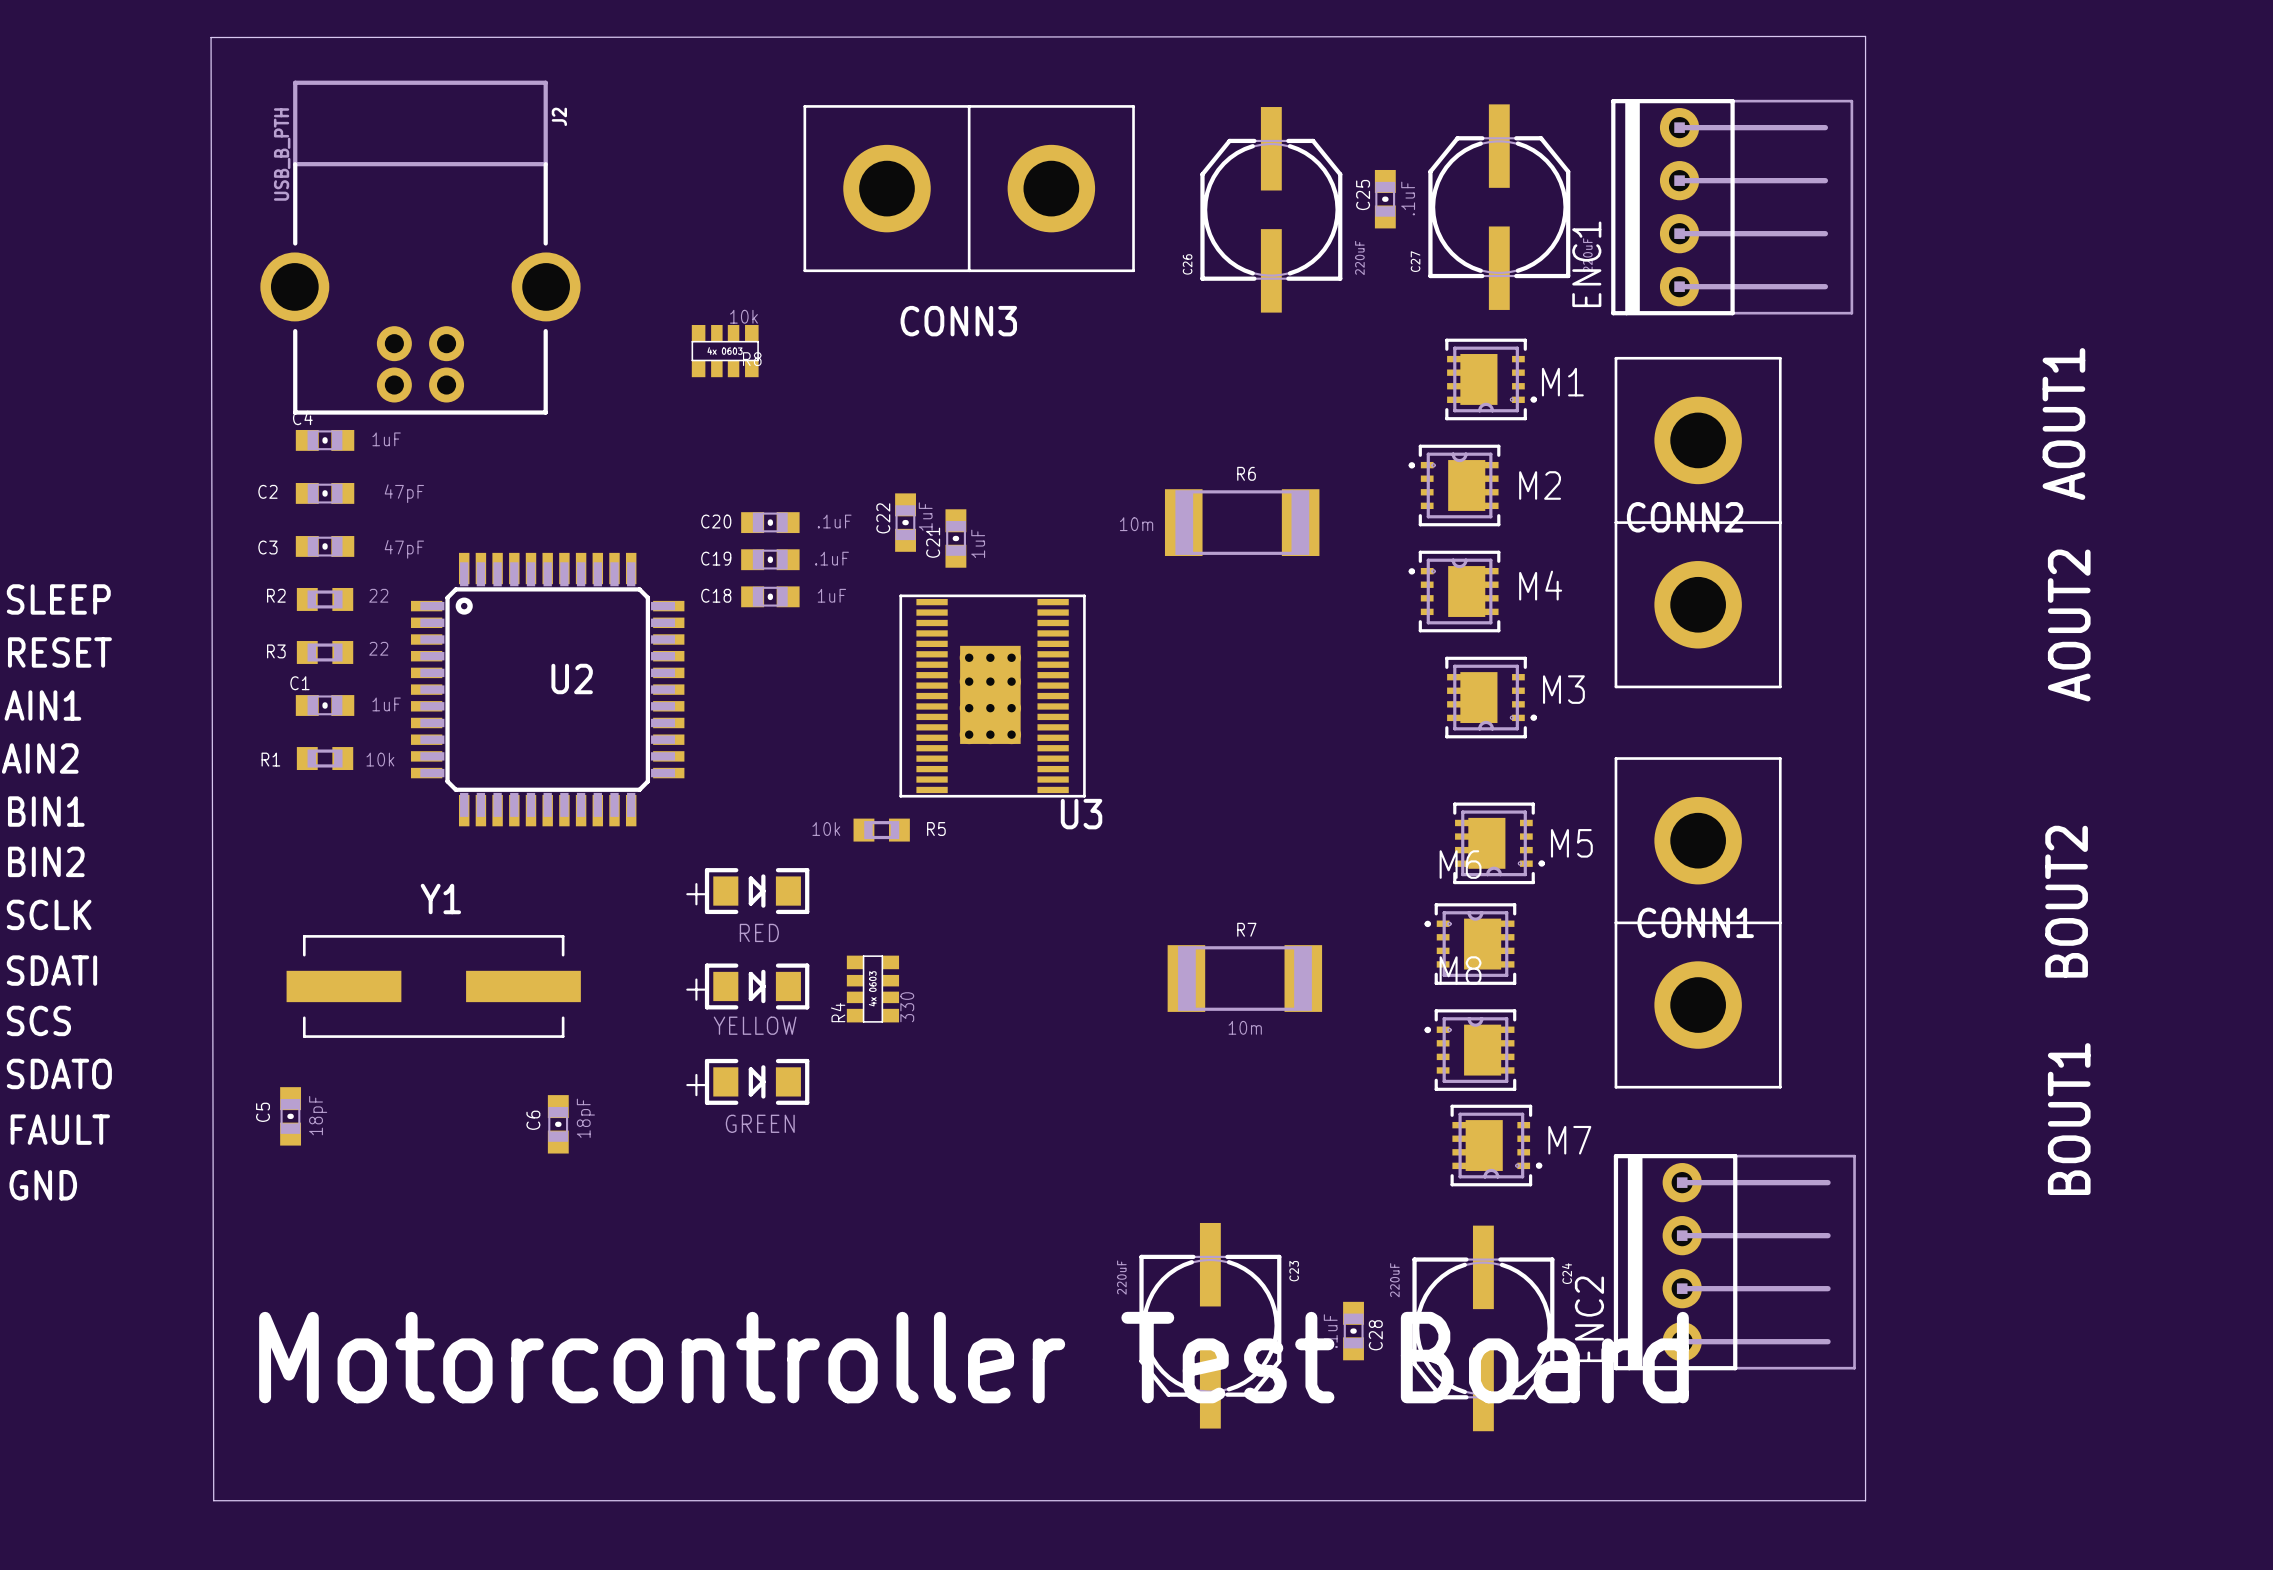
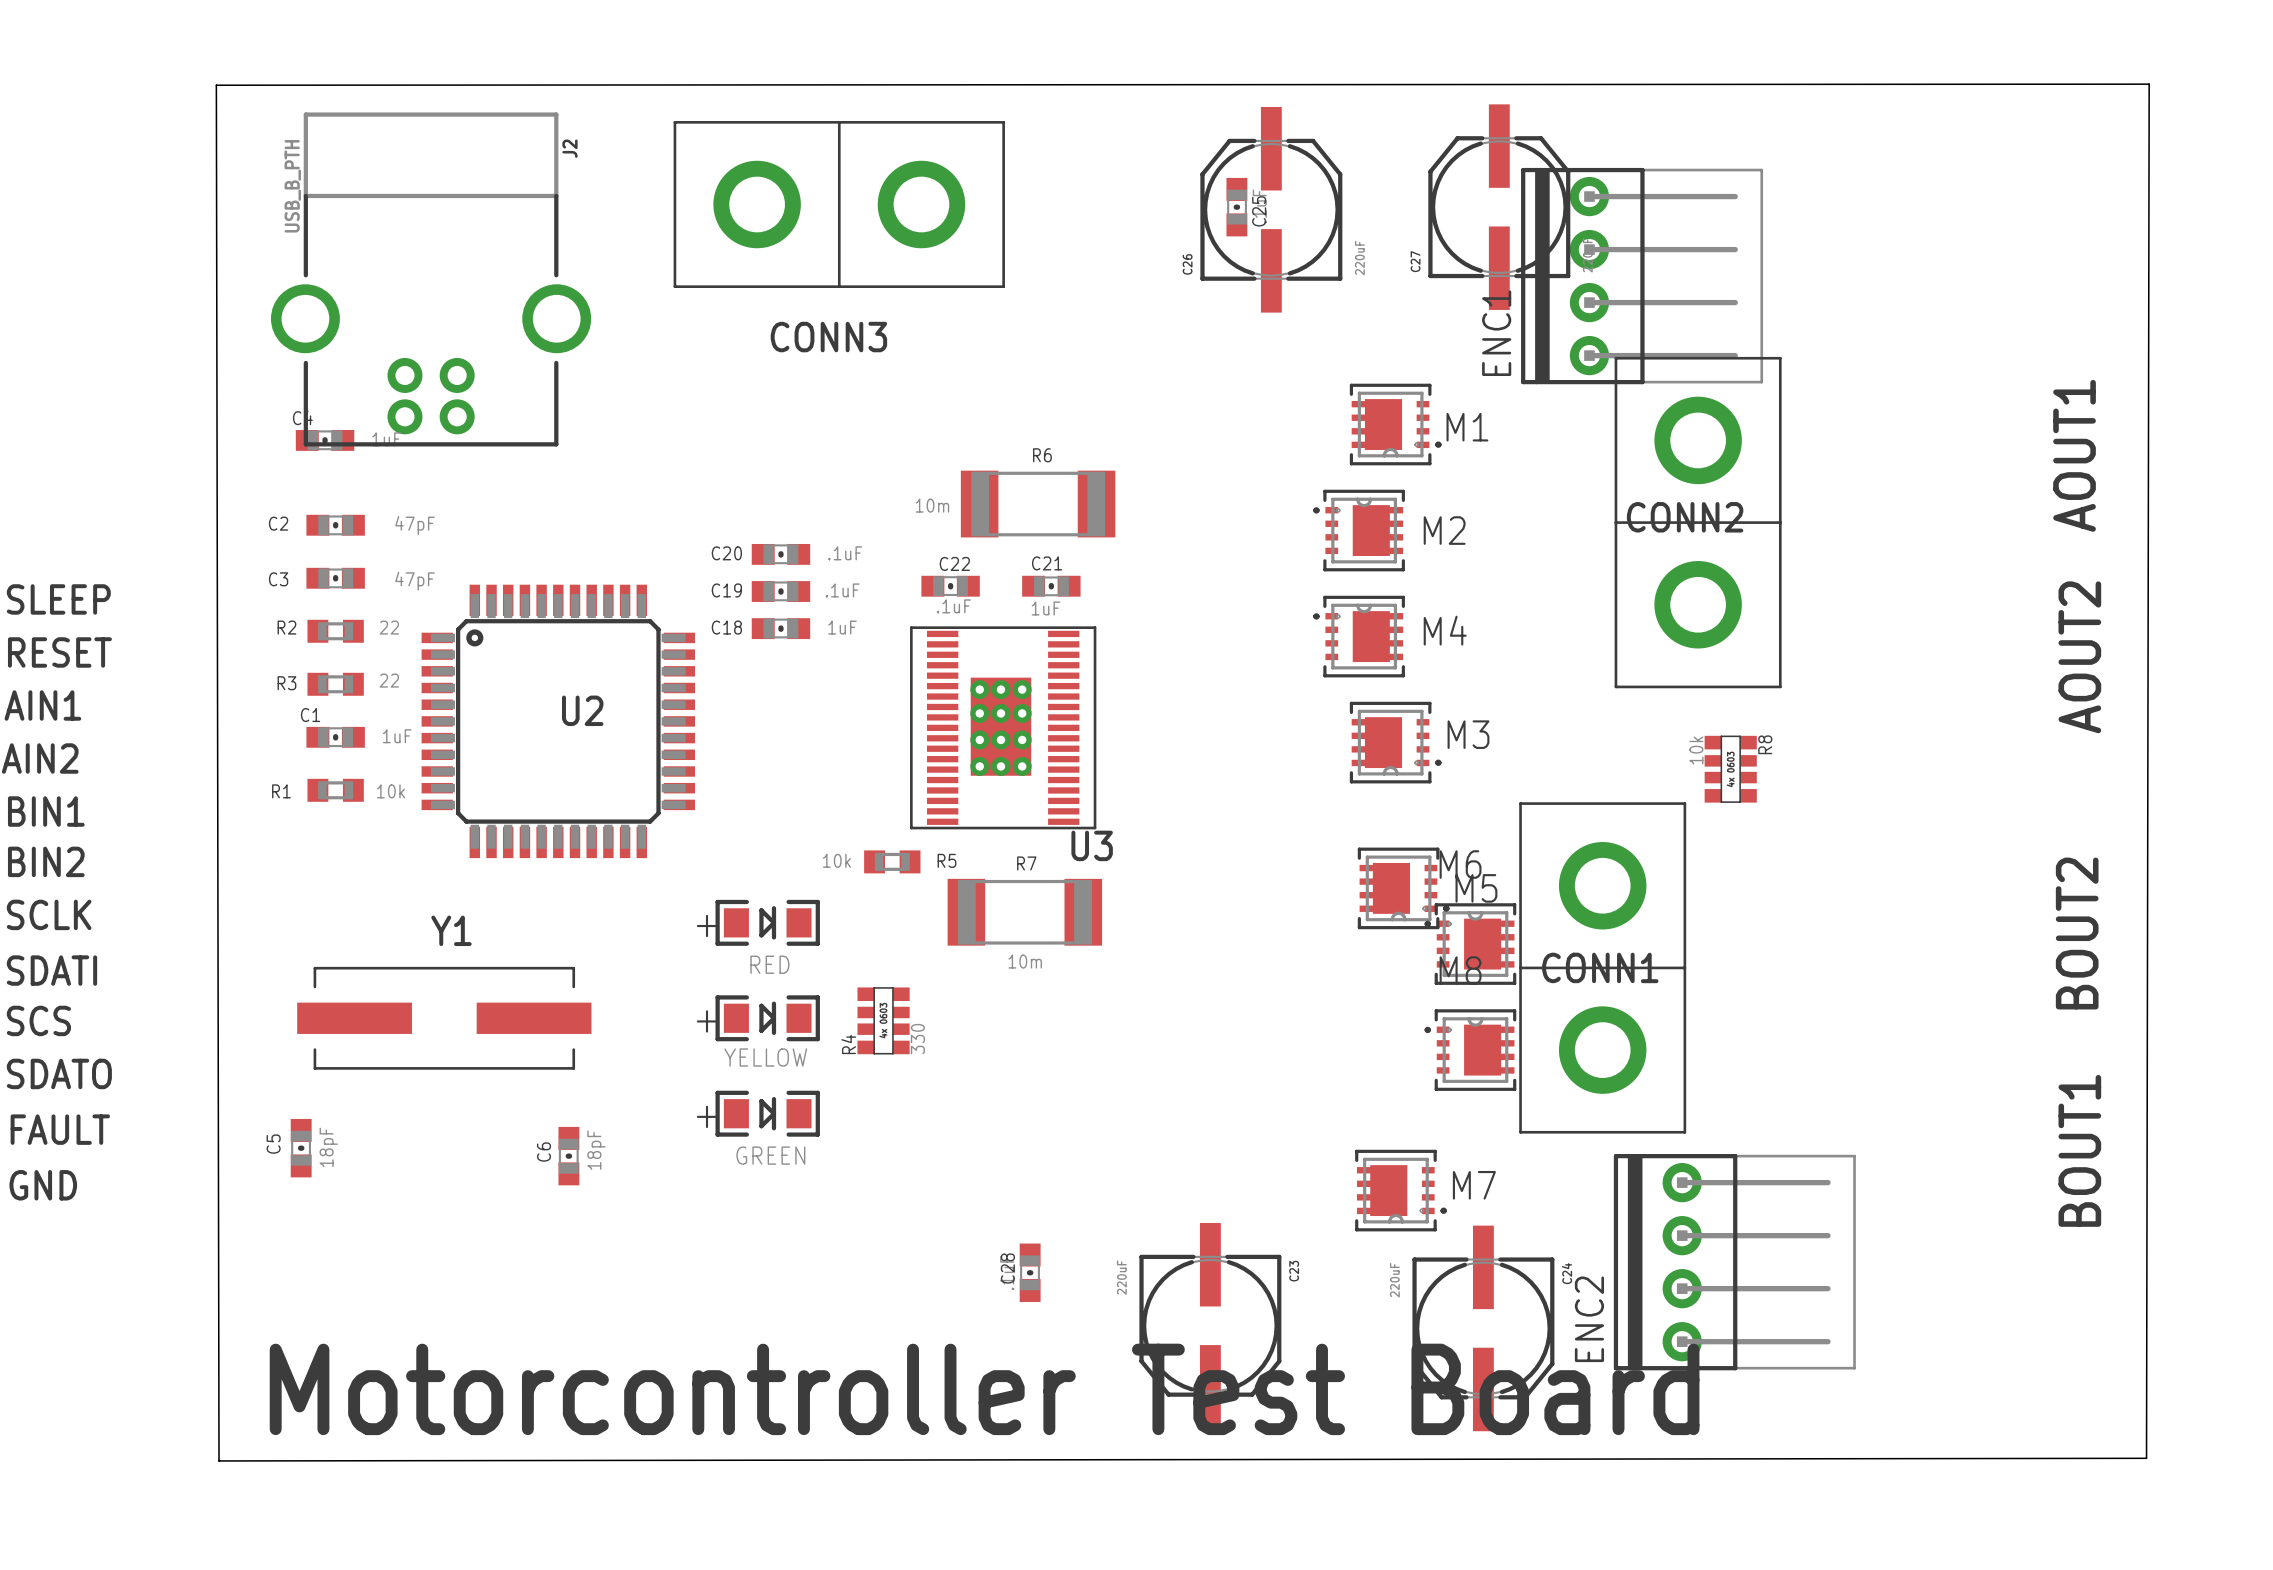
board edge: (1865, 36) (1865, 1500) (213, 1500) (211, 37) (1865, 36) -> (2149, 84) (216, 85) (219, 1460) (2146, 1458) (2149, 84)
CONN3 position: (969, 188) -> (839, 204)
C25 name position: C25 (1363, 194) -> C25 (1259, 211)
C25 position: (1385, 199) -> (1236, 207)
ENC1 position: (1732, 207) -> (1642, 276)
J2 position: (420, 247) -> (431, 279)
R8 rotation: 0° (725, 351) -> 90° counterclockwise (1730, 769)
R8 position: (725, 351) -> (1730, 769)
M1 position: (1491, 379) -> (1395, 424)
text position: AOUT1 (2063, 424) -> AOUT1 (2074, 455)
M2 position: (1454, 485) -> (1359, 530)
C2 position: (325, 493) -> (335, 525)
C20 position: (770, 522) -> (780, 554)
C22 rotation: 0° (905, 522) -> 90° clockwise (950, 586)
C22 position: (905, 522) -> (950, 586)
R6 position: (1242, 522) -> (1038, 504)
C21 rotation: 0° (955, 538) -> 90° clockwise (1051, 586)
C21 position: (955, 538) -> (1051, 586)
C3 position: (325, 546) -> (335, 578)
C19 position: (770, 559) -> (780, 591)
M4 position: (1454, 591) -> (1359, 636)
C18 position: (770, 596) -> (780, 628)
R2 position: (325, 599) -> (335, 631)
text position: AOUT2 (2069, 625) -> AOUT2 (2079, 657)
R3 position: (325, 652) -> (335, 684)
U2 position: (547, 689) -> (558, 721)
U3 position: (992, 696) -> (1003, 727)
M3 position: (1491, 697) -> (1395, 742)
C1 position: (325, 705) -> (335, 737)
R1 position: (325, 758) -> (335, 790)
R5 position: (881, 830) -> (892, 861)
M5 position: (1499, 843) -> (1403, 888)
part position: (757, 891) -> (767, 922)
text position: BOUT2 (2066, 901) -> BOUT2 (2077, 933)
CONN1 position: (1698, 922) -> (1602, 967)
R7 position: (1244, 978) -> (1024, 912)
Y1 position: (433, 986) -> (444, 1018)
part position: (757, 986) -> (767, 1018)
R4 position: (872, 989) -> (883, 1020)
part position: (757, 1081) -> (767, 1113)
C5 position: (290, 1116) -> (301, 1148)
text position: BOUT1 (2069, 1119) -> BOUT1 (2079, 1150)
C6 position: (558, 1124) -> (568, 1156)
M7 position: (1496, 1145) -> (1400, 1190)
C28 position: (1353, 1331) -> (1030, 1272)
C28 name position: C28 (1375, 1335) -> C28 (1007, 1268)
text position: Motorcontroller Test Board (973, 1357) -> Motorcontroller Test Board (984, 1389)

